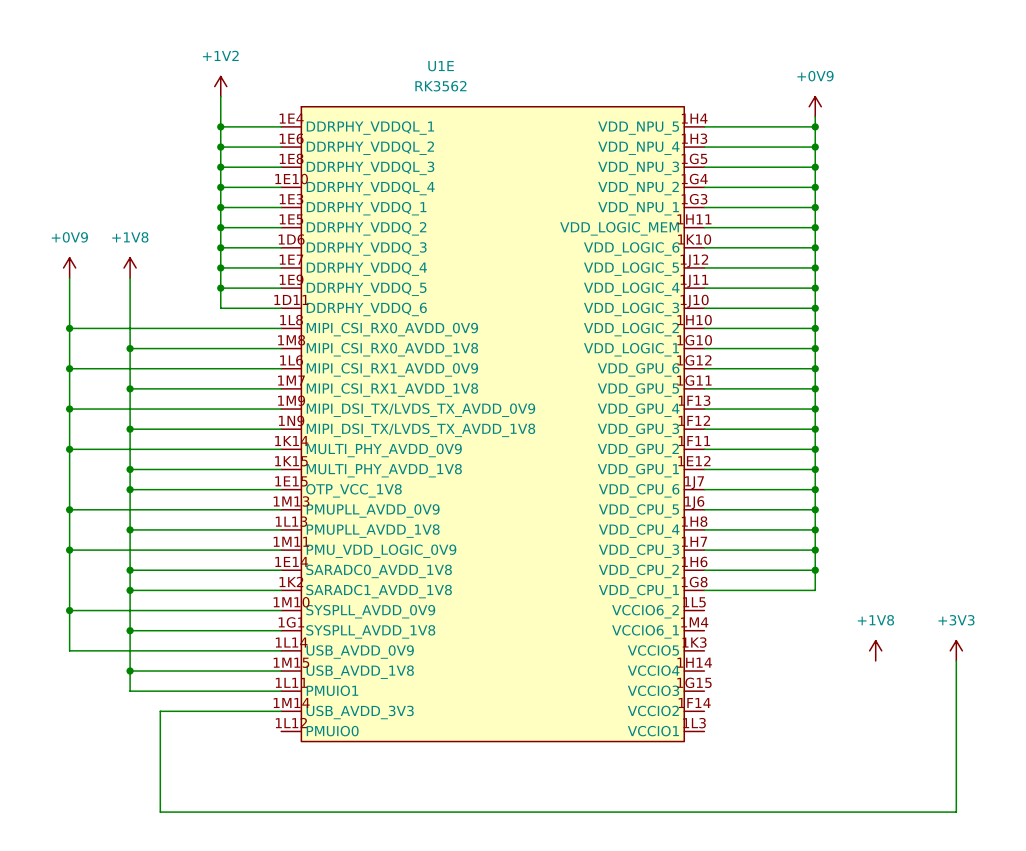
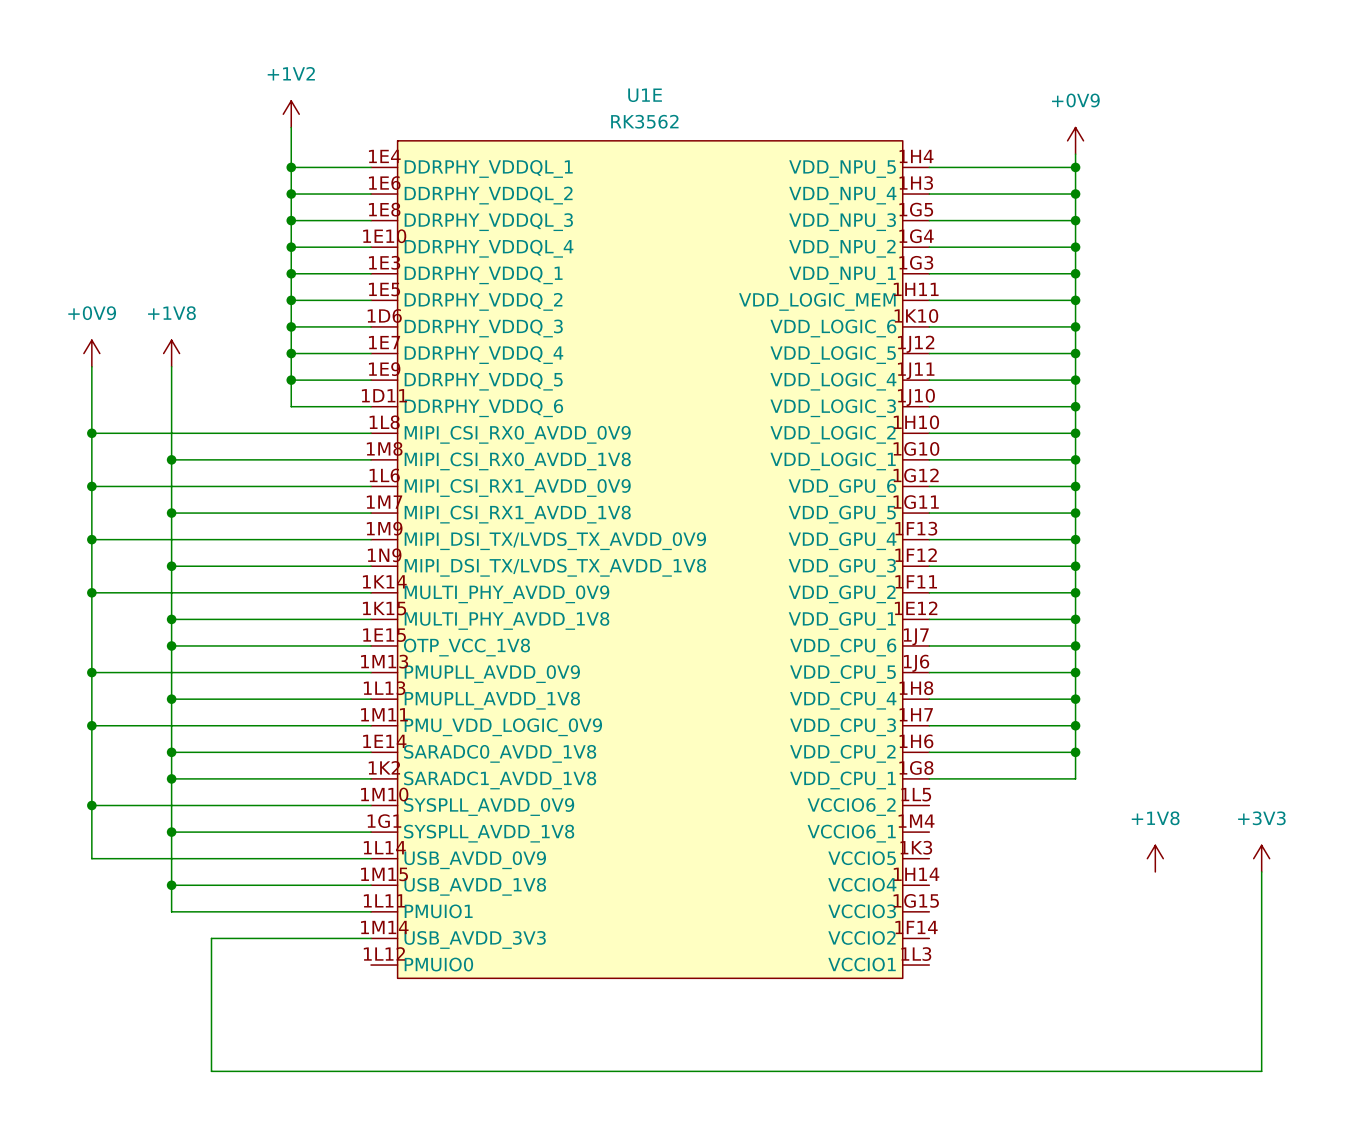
U1E name position: U1E (441, 66) -> U1E (645, 95)
U1E value position: RK3562 (440, 86) -> RK3562 (644, 121)

